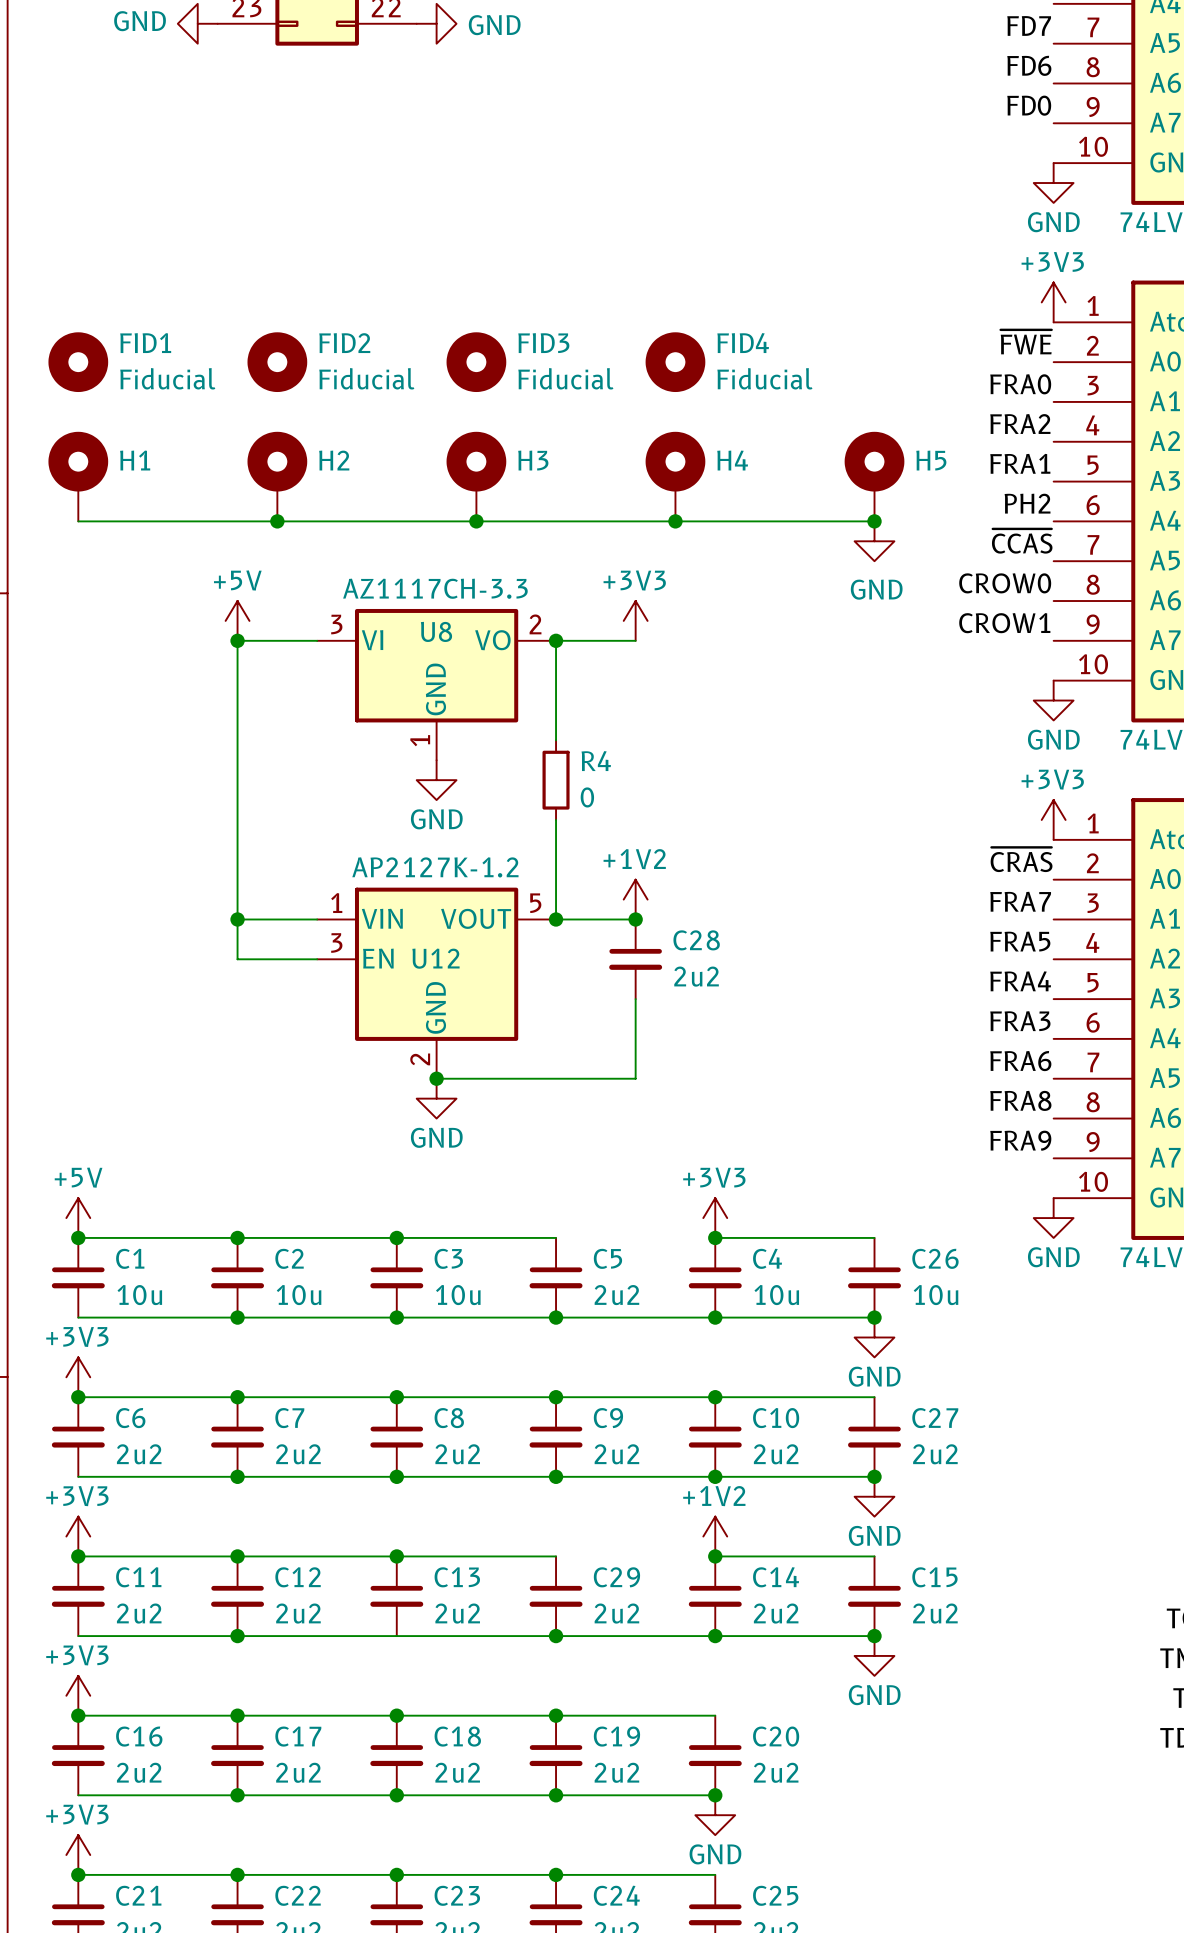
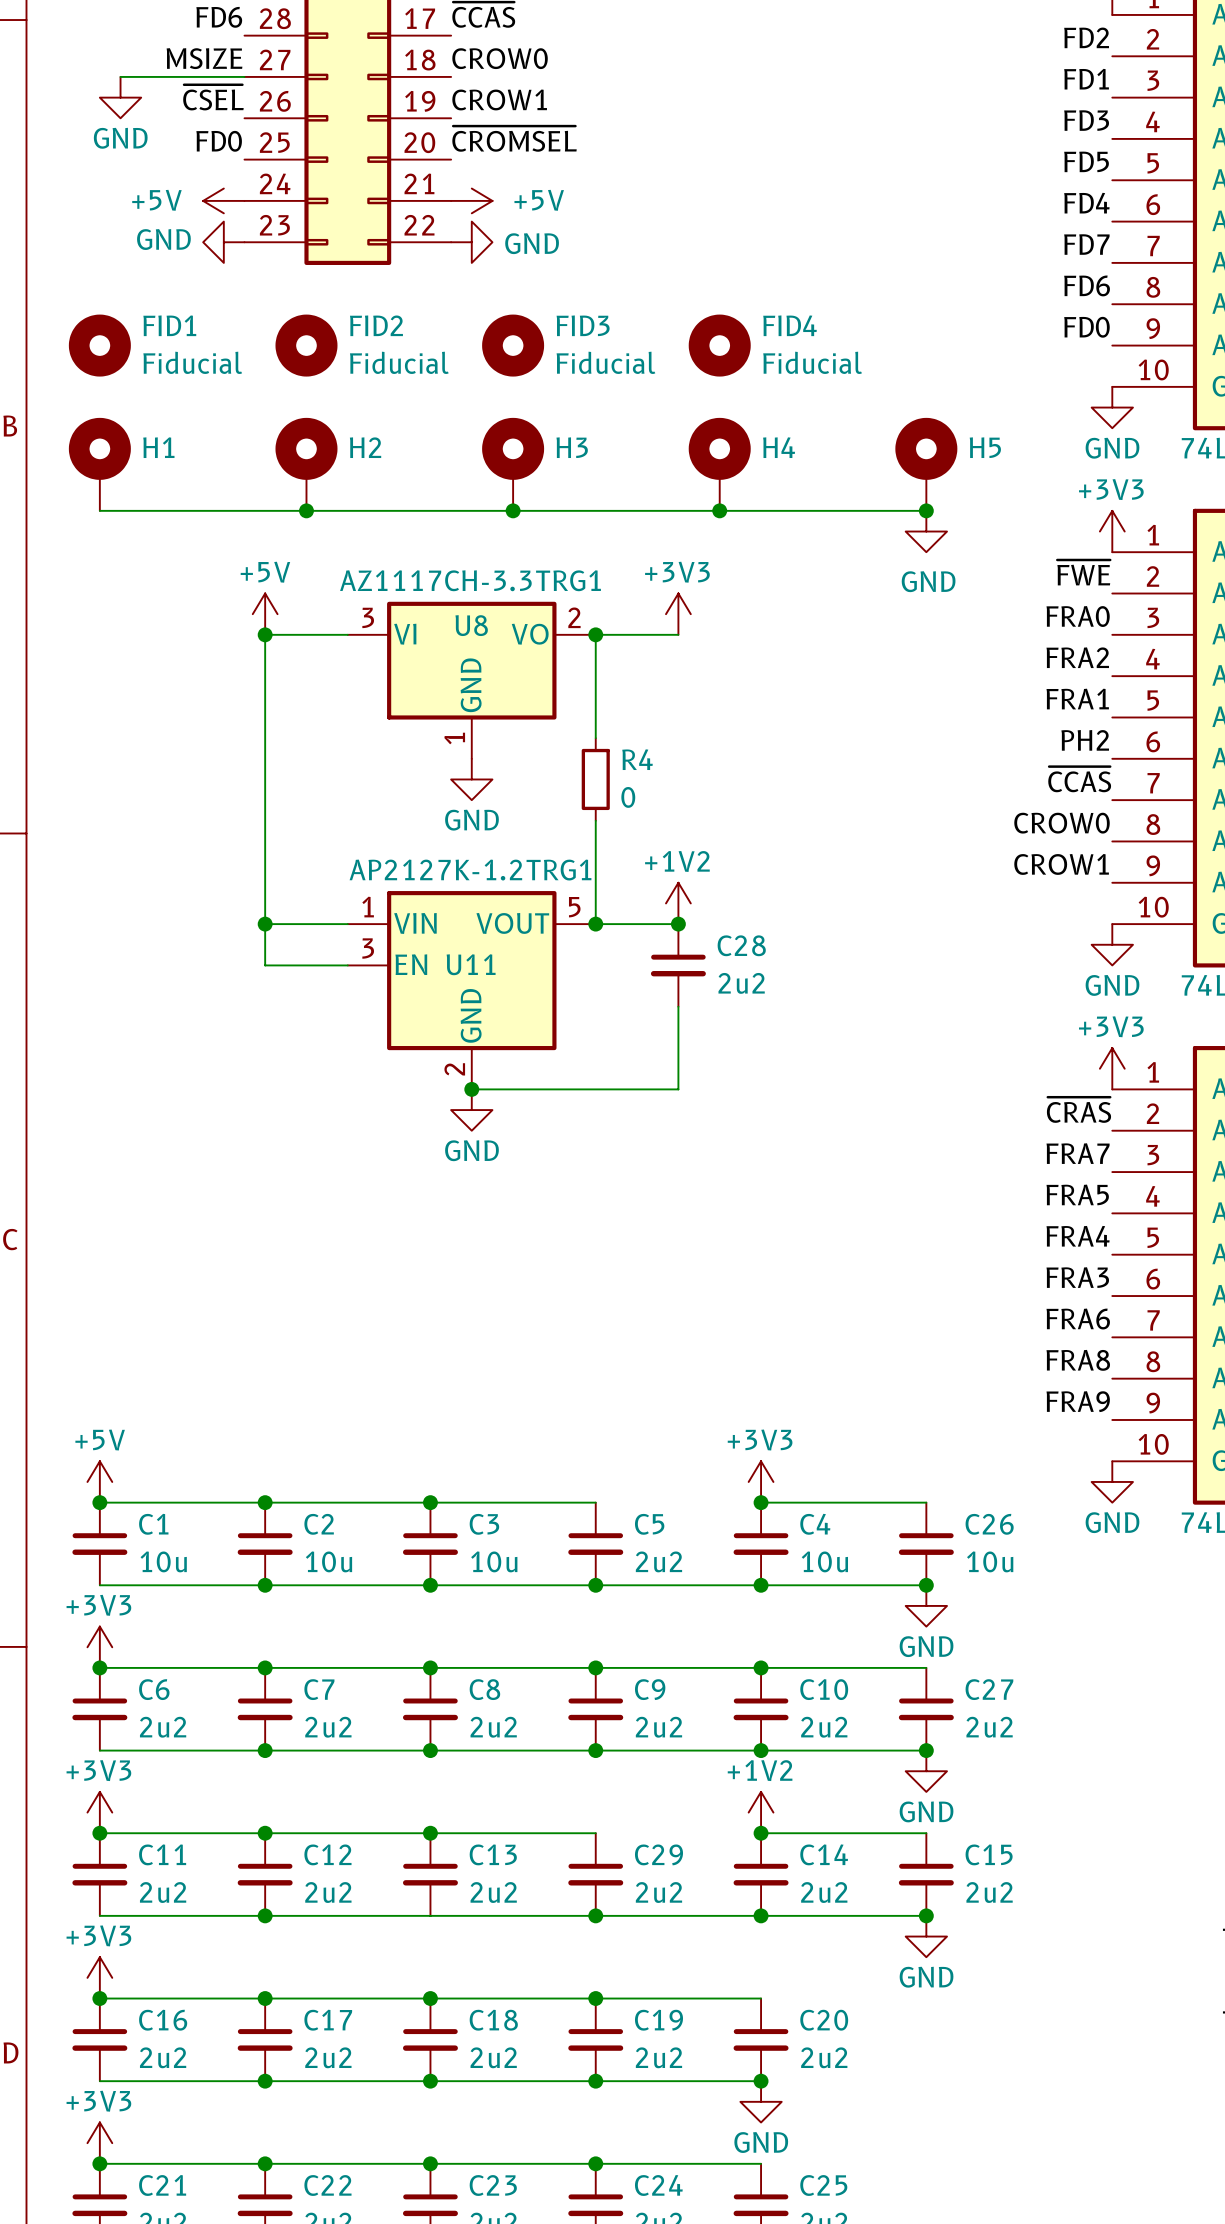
junction: none -> (306, 510)
junction: none -> (513, 510)
junction: none -> (719, 510)
junction: none -> (926, 510)
power symbol: none -> GND (926, 531)
FID1 position: (78, 362) -> (99, 345)
FID2 position: (277, 362) -> (306, 345)
FID3 position: (476, 362) -> (513, 345)
FID4 position: (675, 362) -> (719, 345)
junction: none -> (265, 634)
junction: none -> (595, 634)
wire: none -> (678, 634) (595, 634) (595, 738)
H1 position: (78, 476) -> (99, 464)
H2 position: (277, 476) -> (306, 464)
H3 position: (476, 476) -> (513, 464)
H4 position: (675, 476) -> (719, 464)
H5 position: (874, 476) -> (926, 464)
wire: (78, 521) (874, 521) -> (99, 510) (926, 510)
junction: (277, 521) -> none
junction: (476, 521) -> none
junction: (675, 521) -> none
junction: (874, 521) -> none
power symbol: none -> GND (471, 779)
power symbol: GND (874, 541) -> none
U8 value: AZ1117CH-3.3 (435, 588) -> AZ1117CH-3.3TRG1 (470, 580)
power symbol position: +5V (237, 620) -> +5V (265, 614)
power symbol position: +3V3 (635, 620) -> +3V3 (678, 614)
wire: (237, 640) (317, 640) -> (265, 882) (265, 634) (347, 634)
junction position: (237, 640) -> (265, 924)
wire: (556, 640) (635, 640) -> (595, 882) (595, 820)
junction position: (556, 640) -> (595, 924)
wire: (556, 680) (556, 740) -> (595, 924) (678, 924)
junction: none -> (678, 924)
U8 position: (436, 684) -> (471, 680)
wire: (237, 720) (237, 959) (317, 959) -> (265, 965) (347, 965)
U11: none -> AP2127K-1.2TRG1 (471, 990)
power symbol position: GND (436, 780) -> GND (471, 1110)
R4 position: (556, 780) -> (595, 779)
wire: (556, 819) (556, 919) (635, 919) -> none
junction: none -> (471, 1089)
power symbol position: +1V2 (635, 899) -> +1V2 (678, 903)
wire: (237, 919) (317, 919) -> (265, 924) (347, 924)
junction: (237, 919) -> none
junction: (556, 919) -> none
junction: (635, 919) -> none
C28 position: (635, 959) -> (678, 965)
U12: AP2127K-1.2 (436, 983) -> none
wire: (635, 999) (635, 1078) (436, 1078) -> (678, 1006) (678, 1089) (471, 1089)
junction: (436, 1078) -> none
power symbol: GND (436, 1098) -> none

